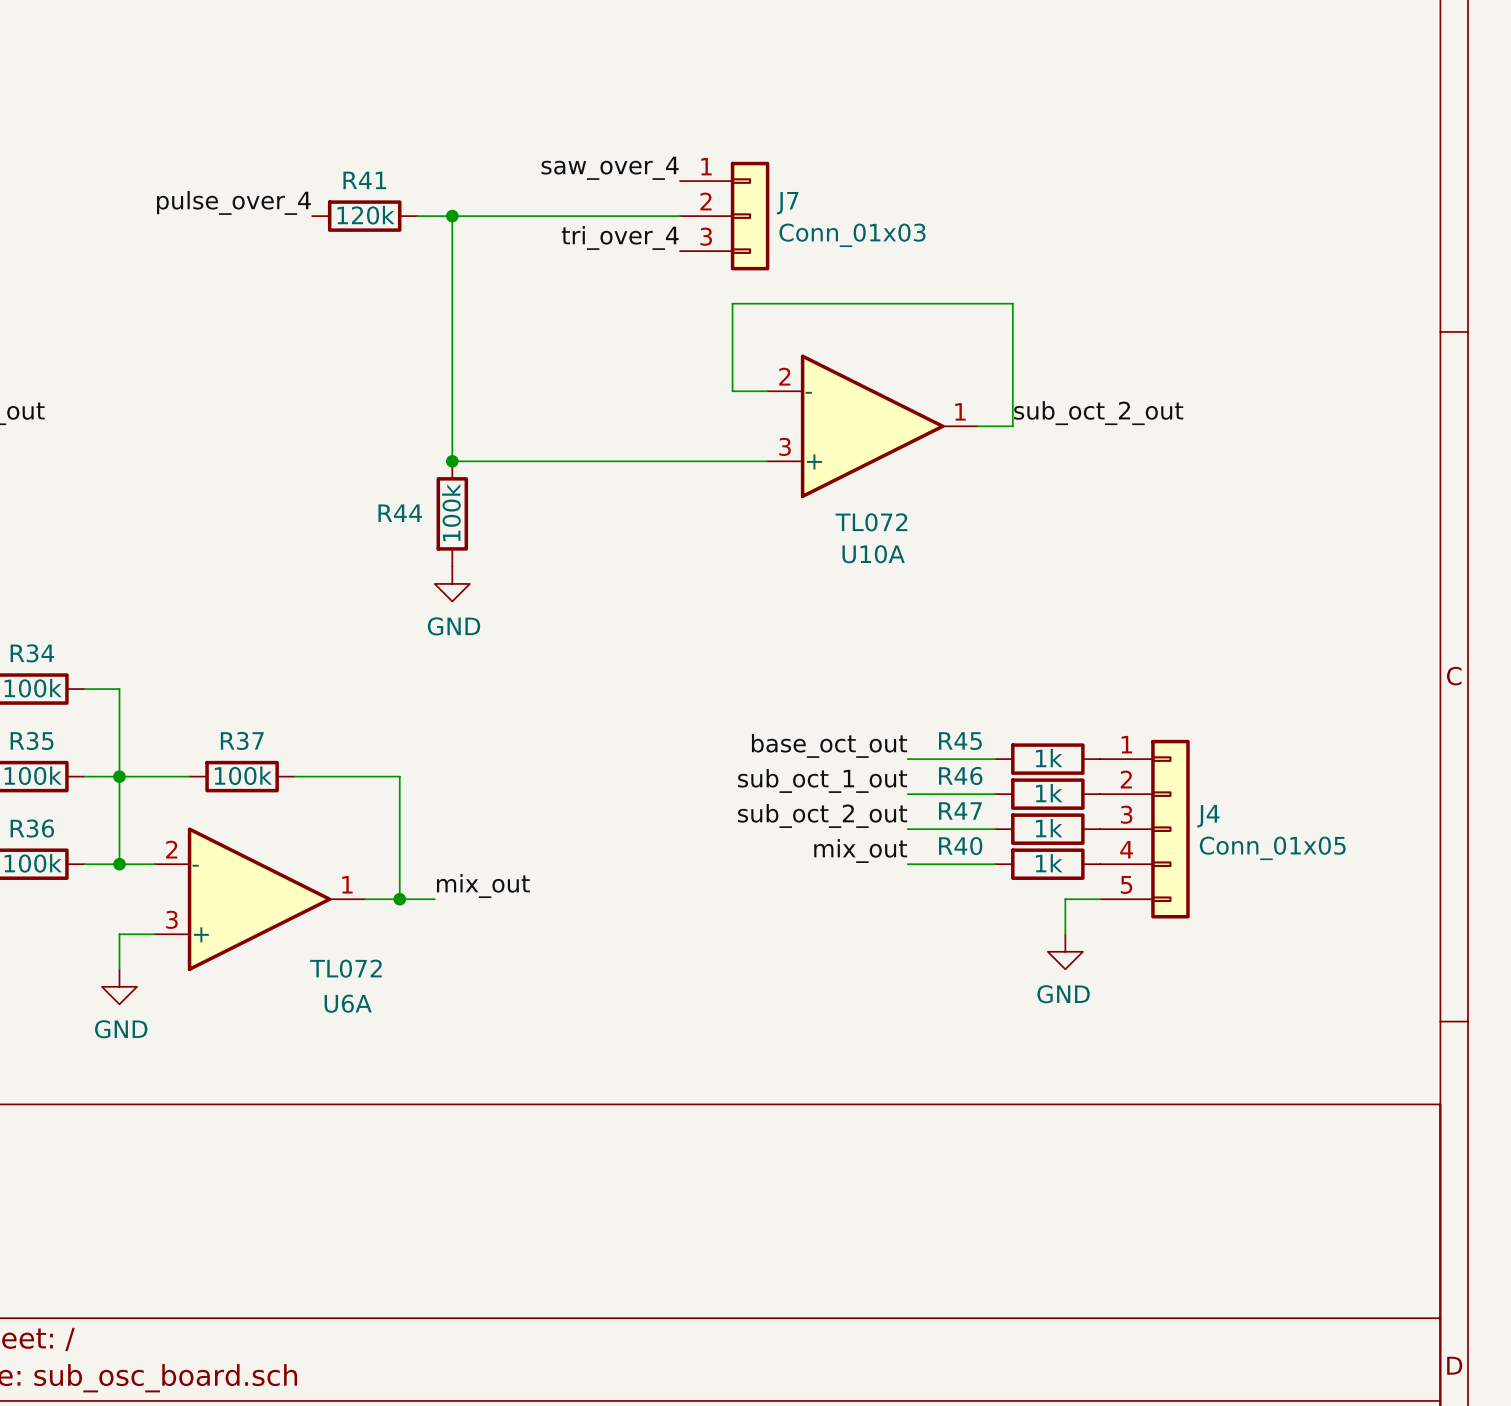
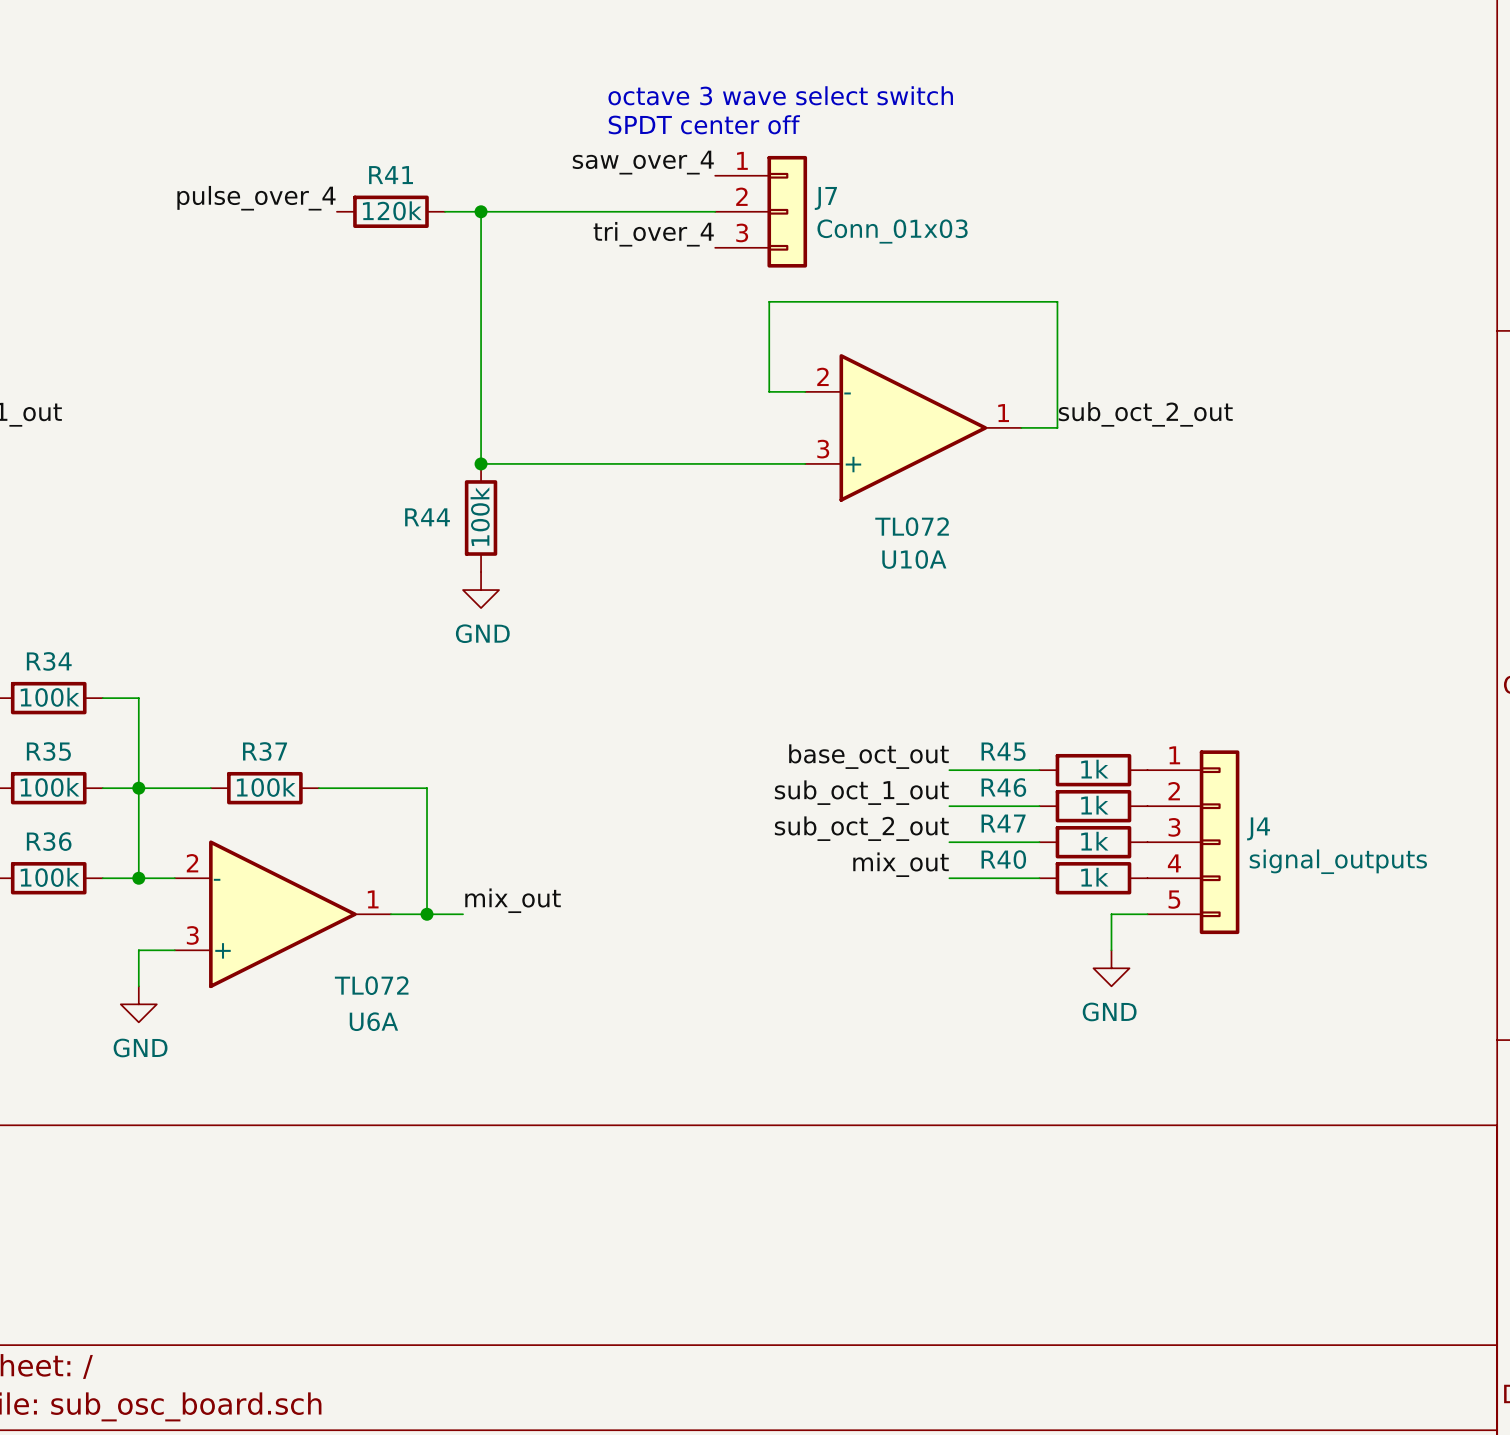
text: none -> octave 3 wave select switch (780, 95)
text: none -> SPDT center off (704, 124)
J4 value: Conn_01x05 (1272, 848) -> signal_outputs (1338, 861)

